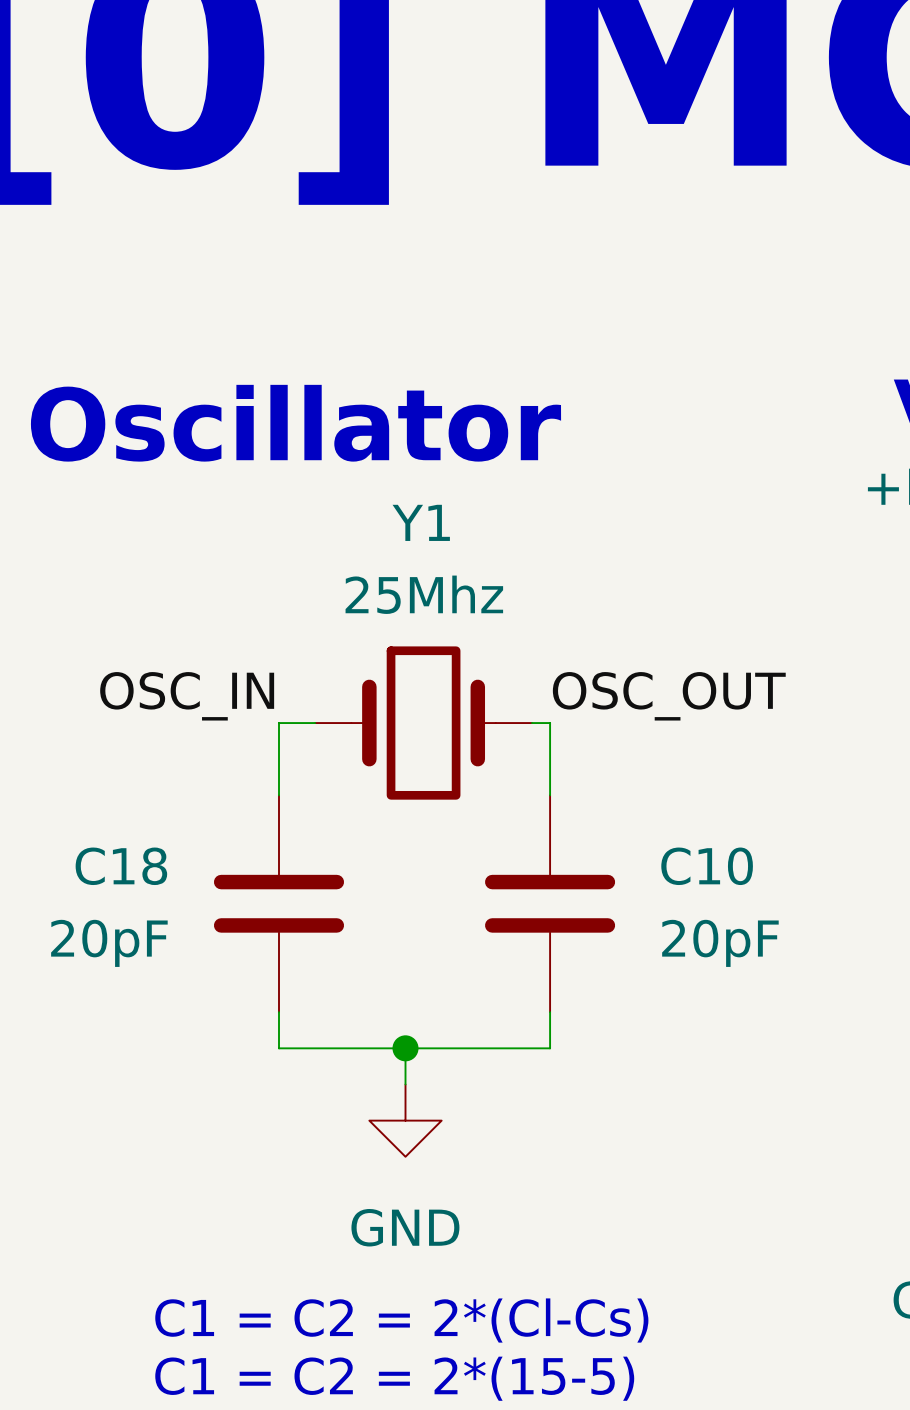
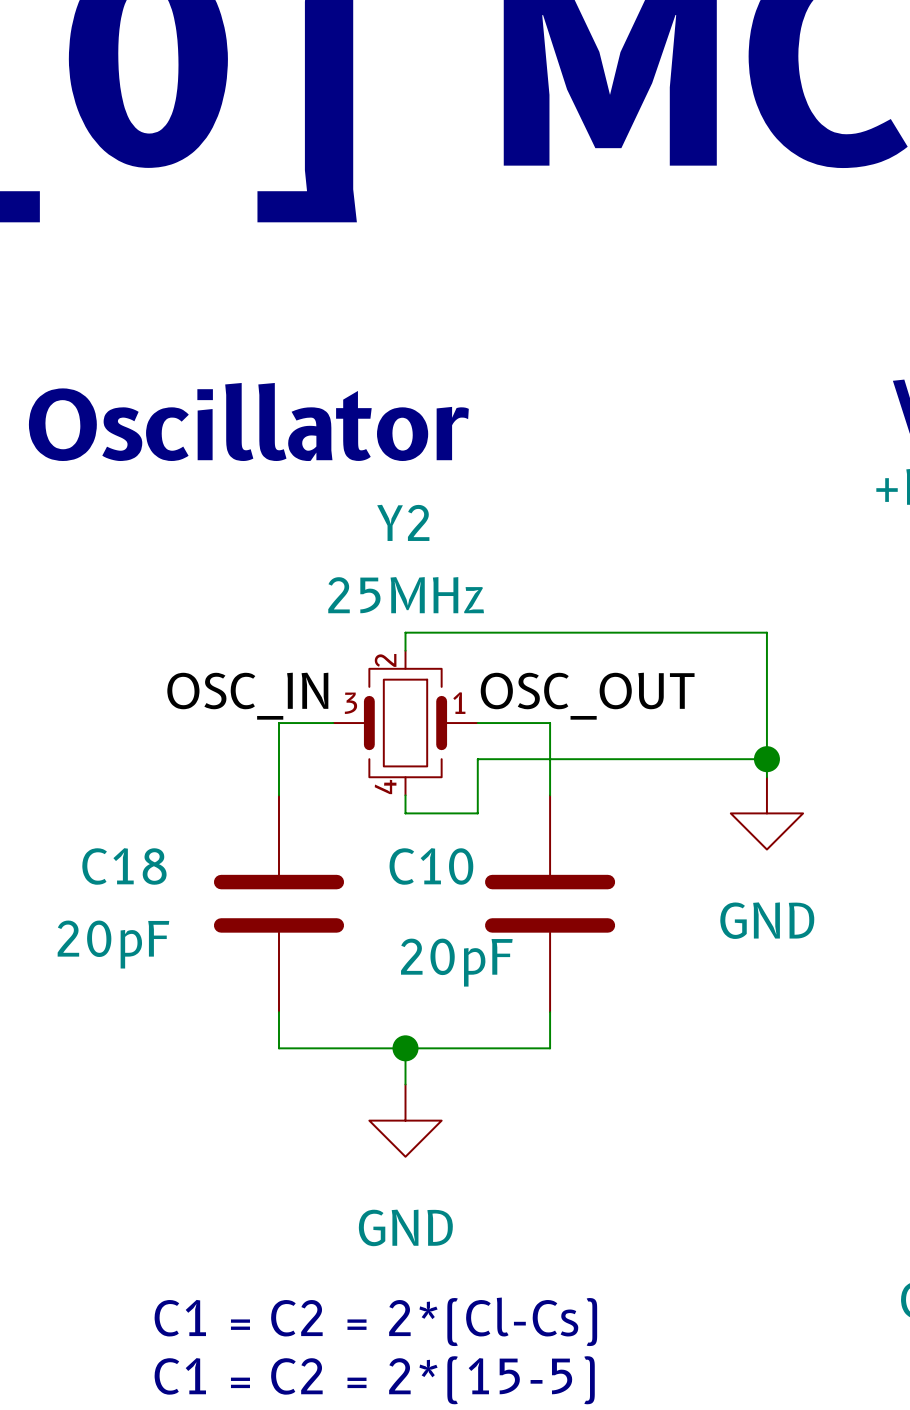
wire: none -> (405, 650) (405, 632) (766, 632) (766, 777)
label position: OSC_IN (187, 696) -> OSC_IN (247, 696)
label position: OSC_OUT (669, 696) -> OSC_OUT (587, 696)
Y2: none -> 25MHz (405, 723)
Y1: 25Mhz (423, 723) -> none
wire: none -> (766, 759) (477, 759) (477, 813) (405, 813) (405, 795)
junction: none -> (766, 759)
power symbol: none -> GND (766, 813)
C10 name position: C10 (707, 866) -> C10 (431, 866)
C10 value position: 20pF (720, 943) -> 20pF (456, 962)

